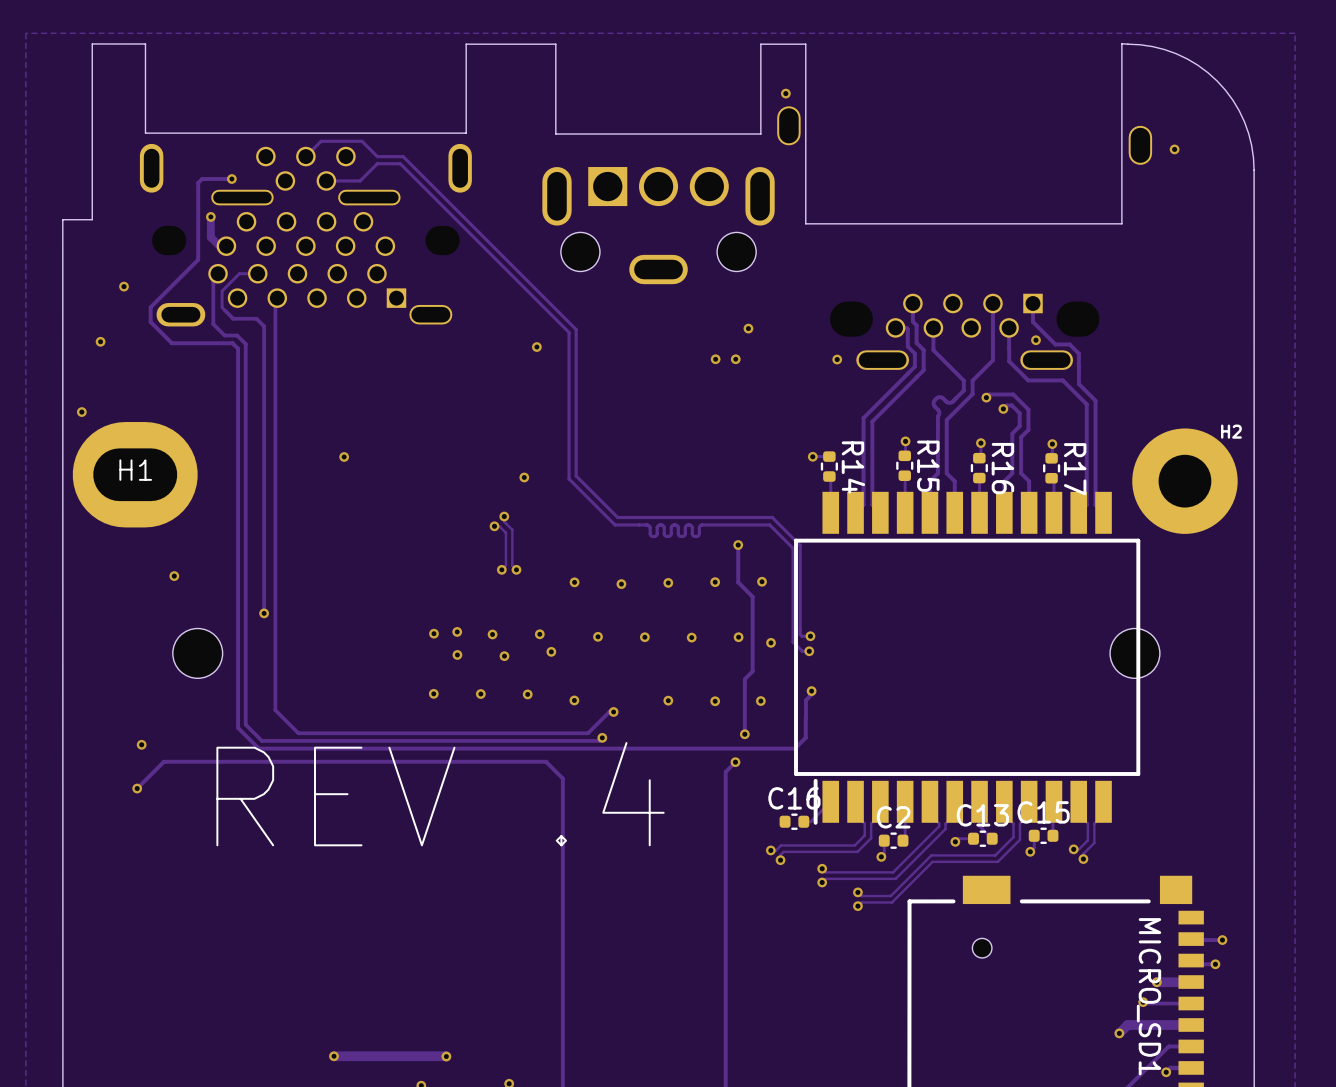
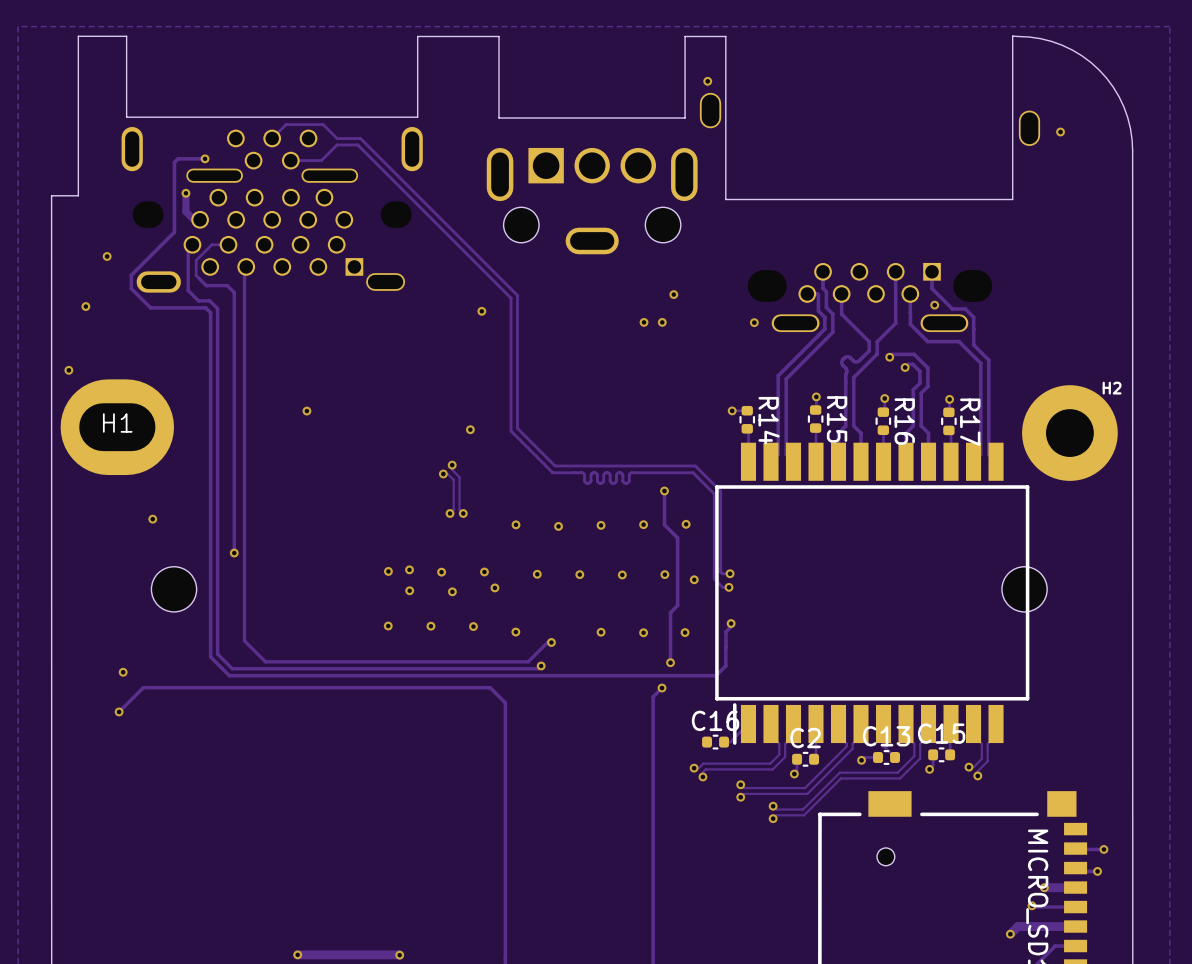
text: REV .4 (440, 794) -> none

